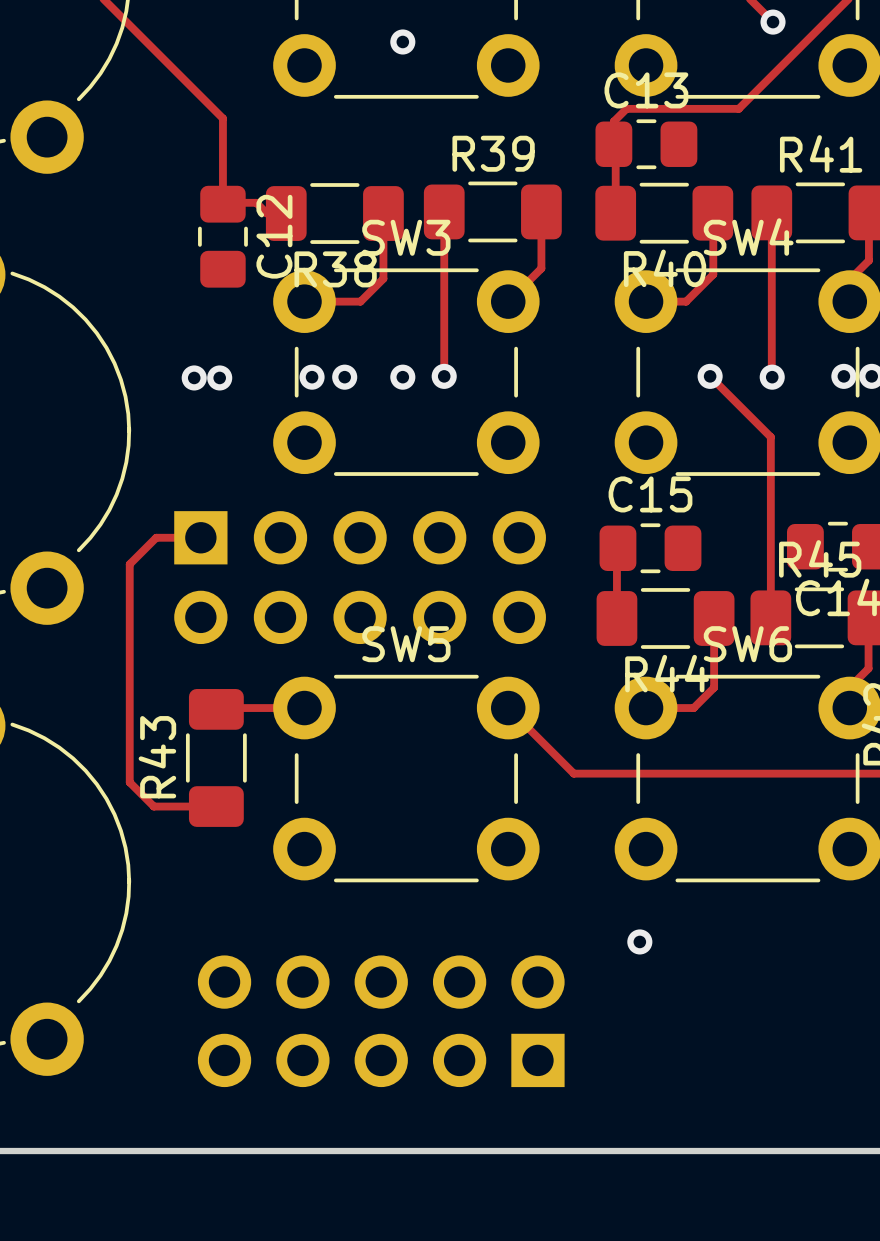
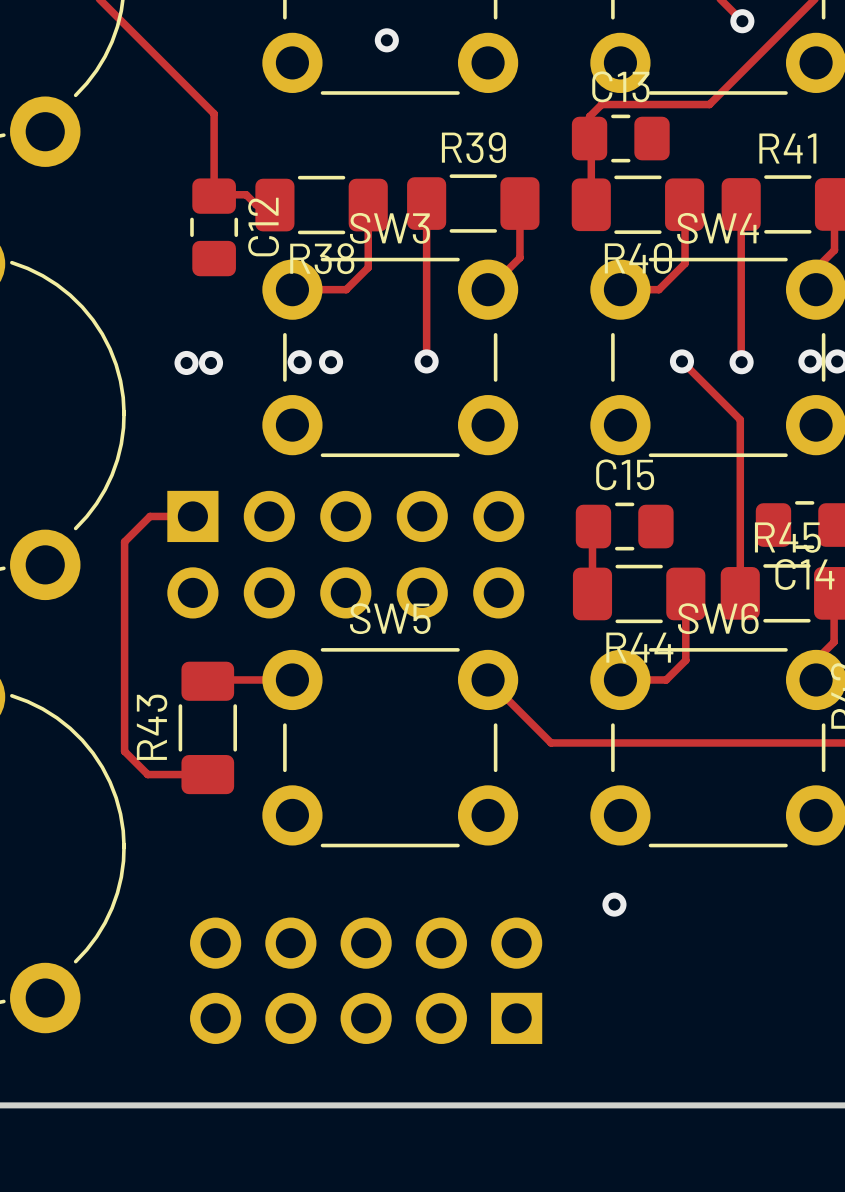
via: (402, 377) -> none

